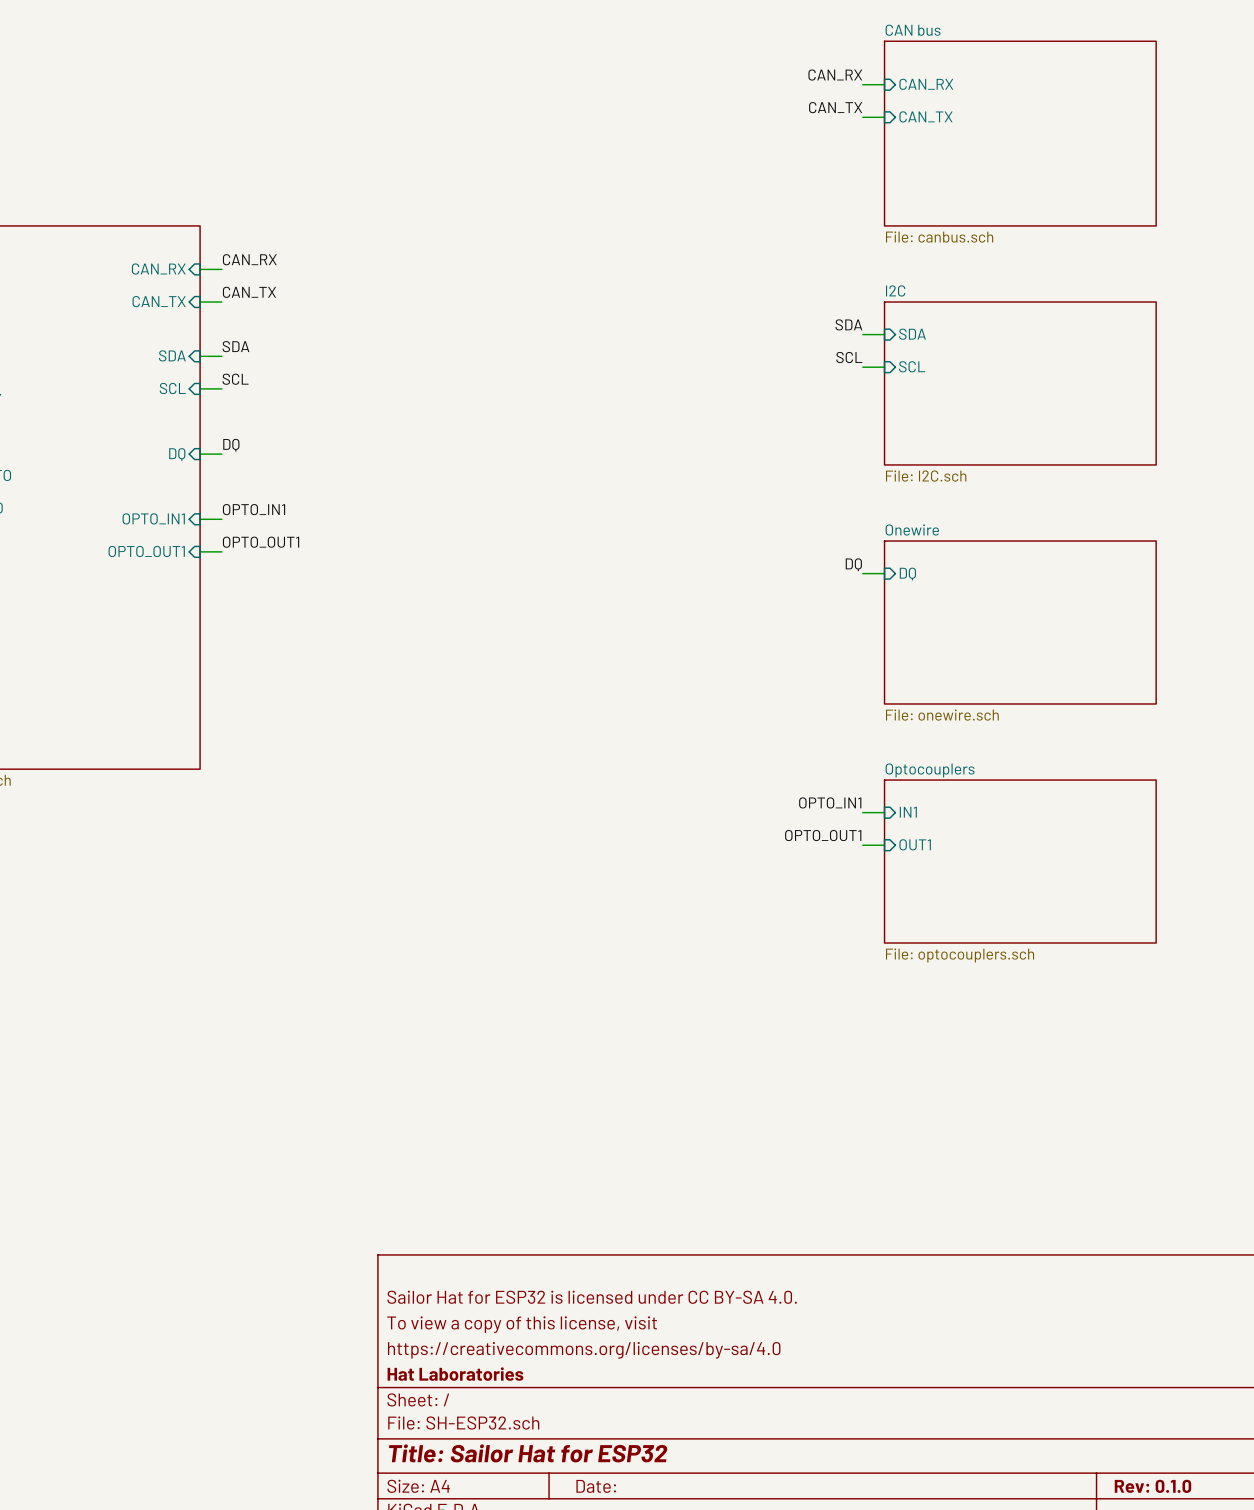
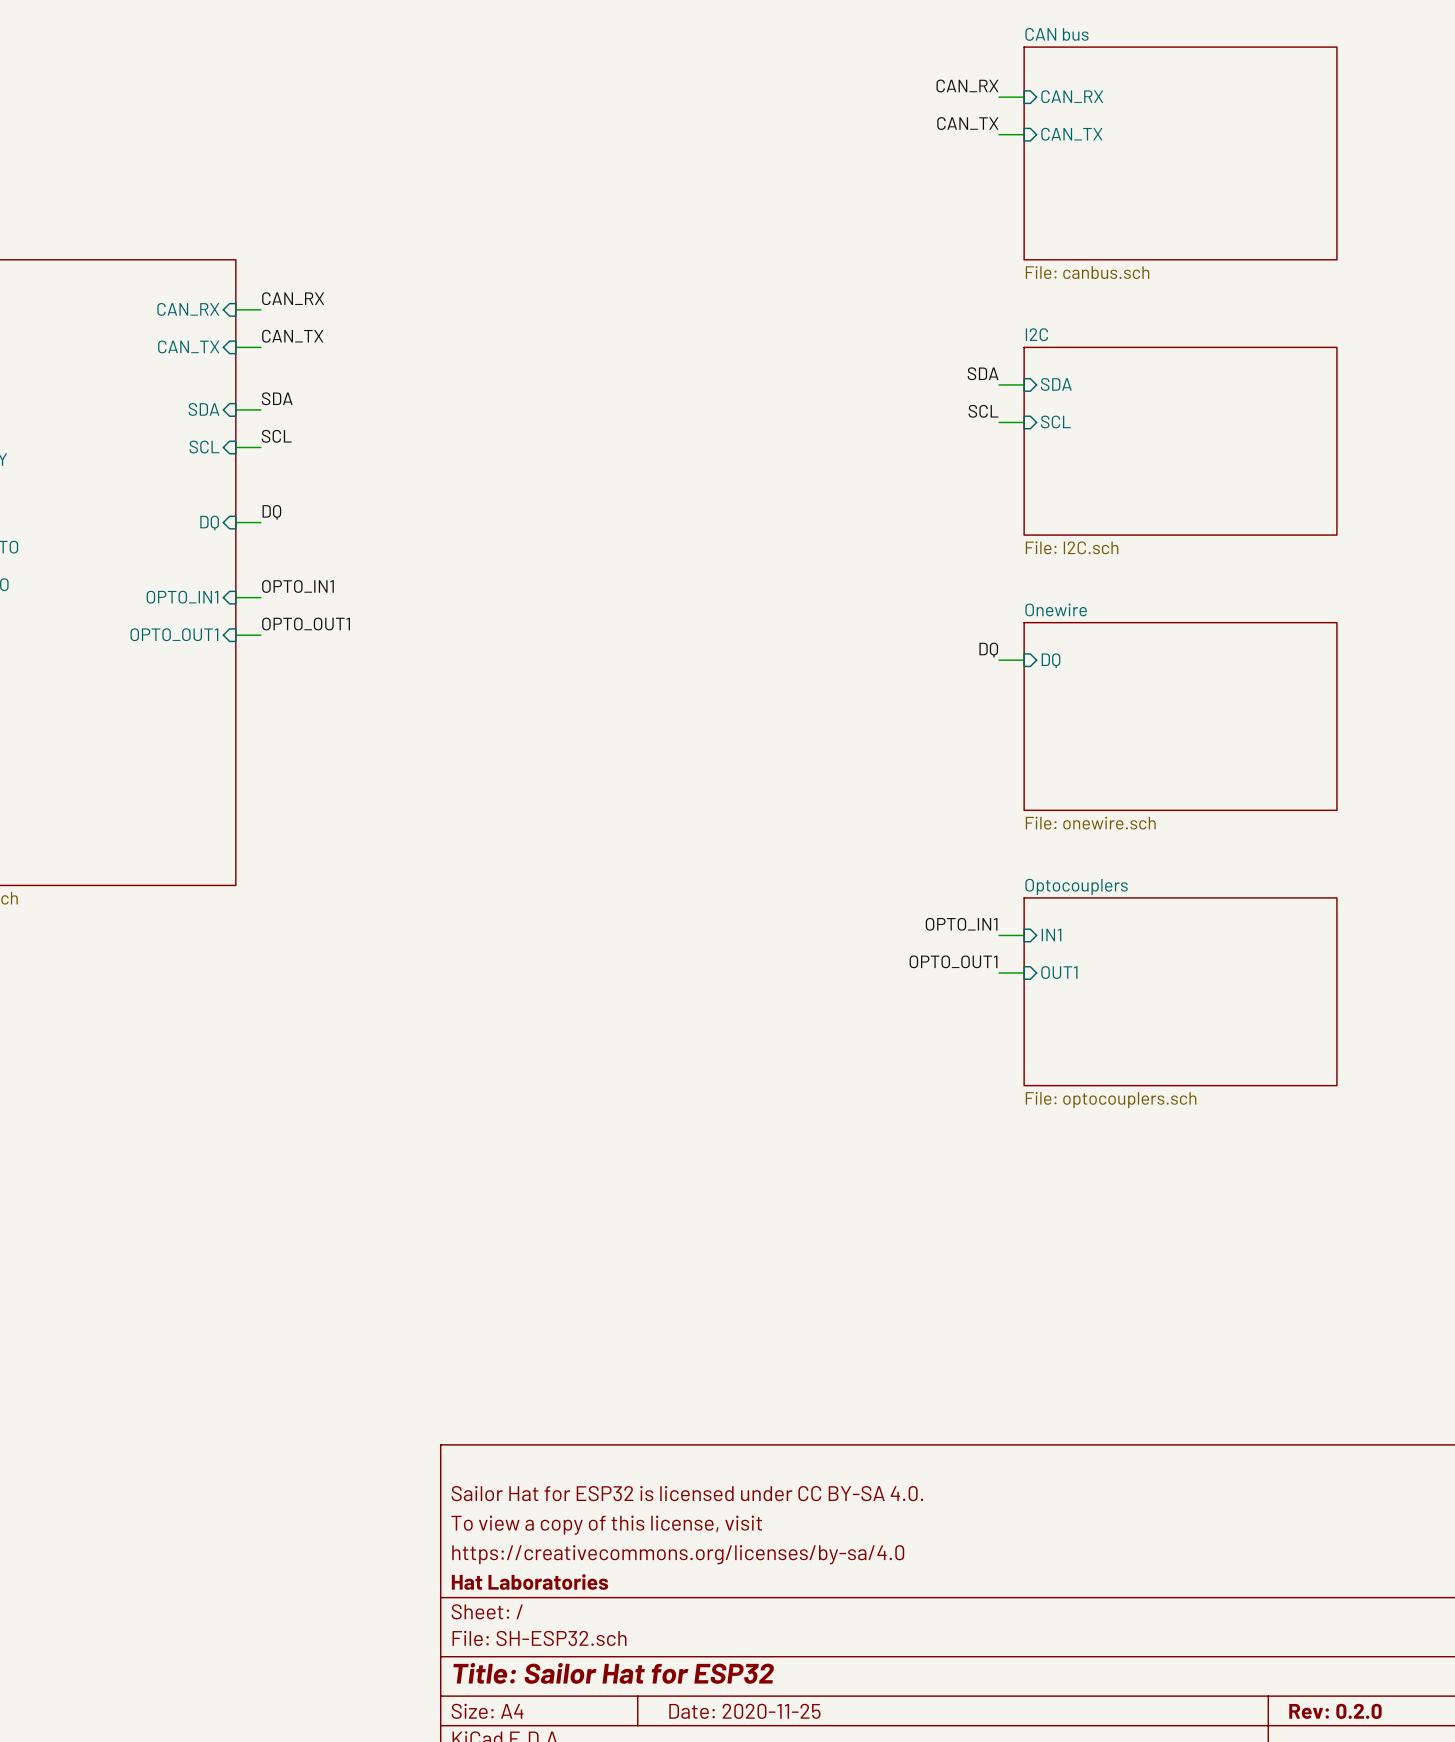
title block: Date: (596, 1486) -> Date: 2020-11-25 (744, 1711)
title block: Rev: 0.1.0 (1152, 1486) -> Rev: 0.2.0 (1335, 1711)

